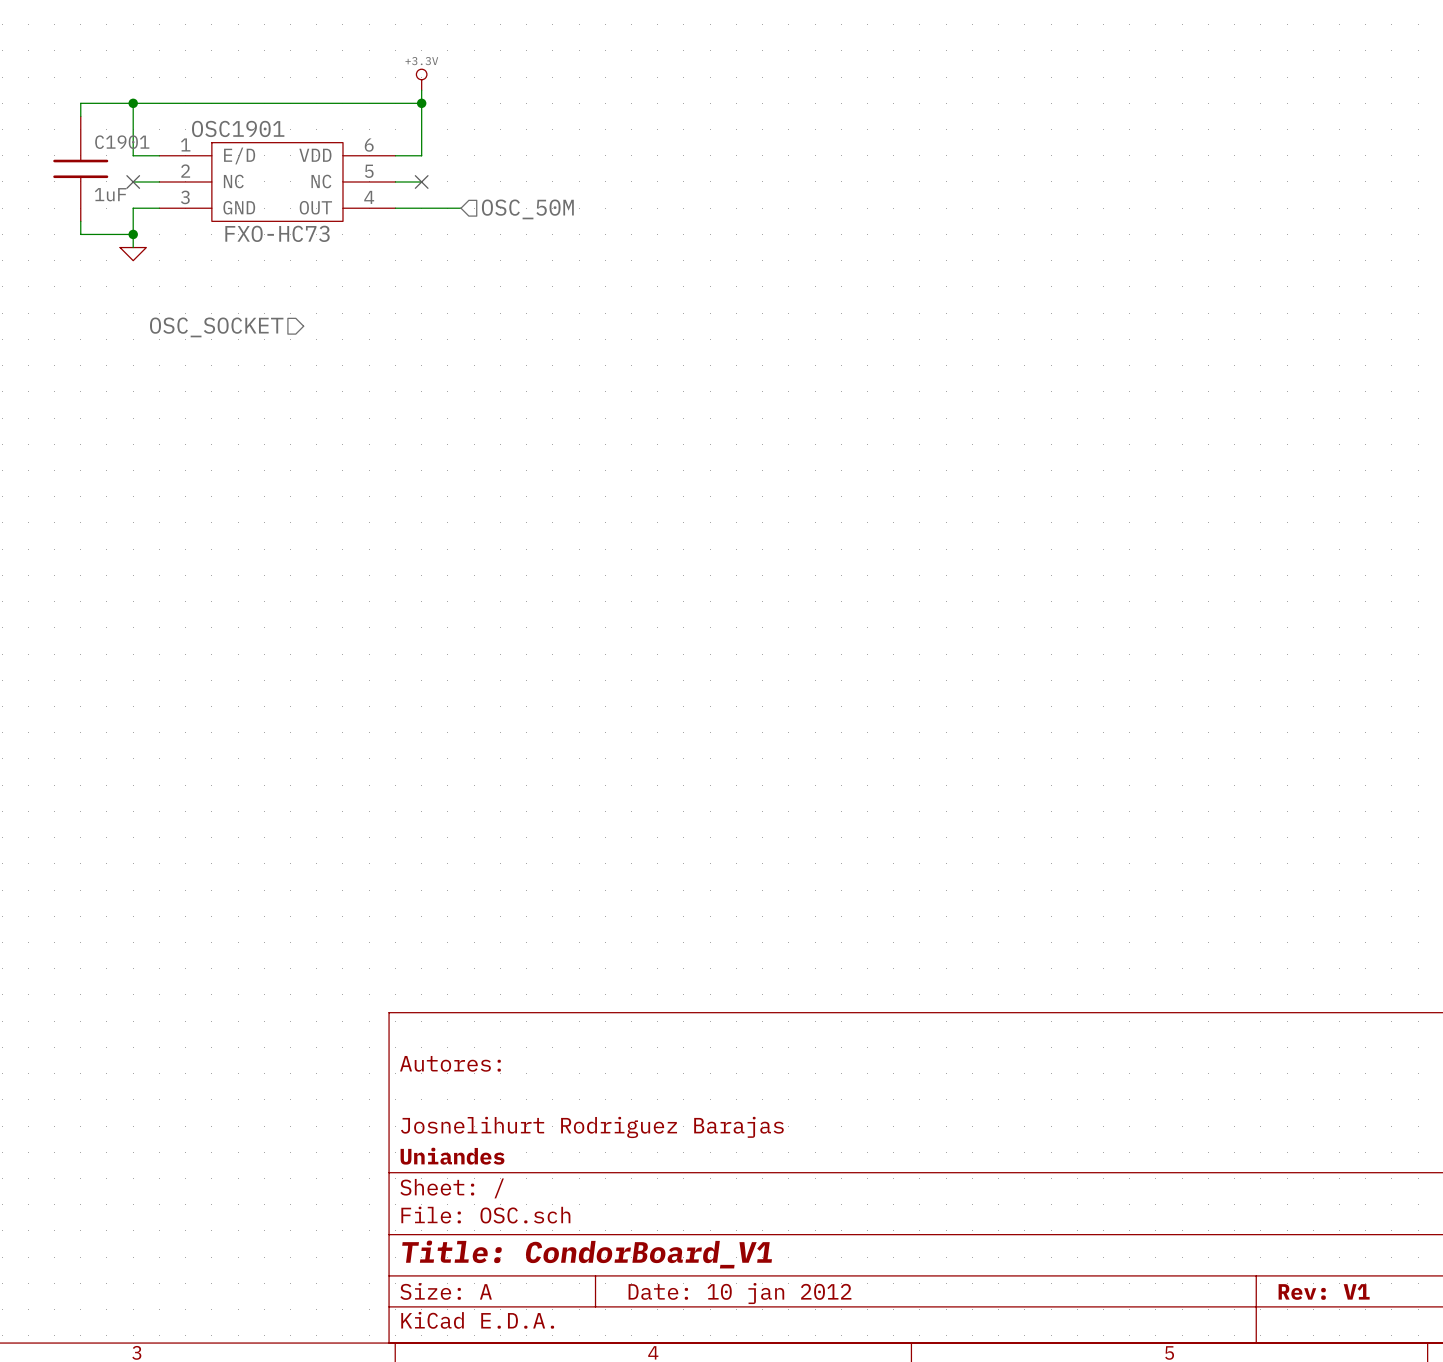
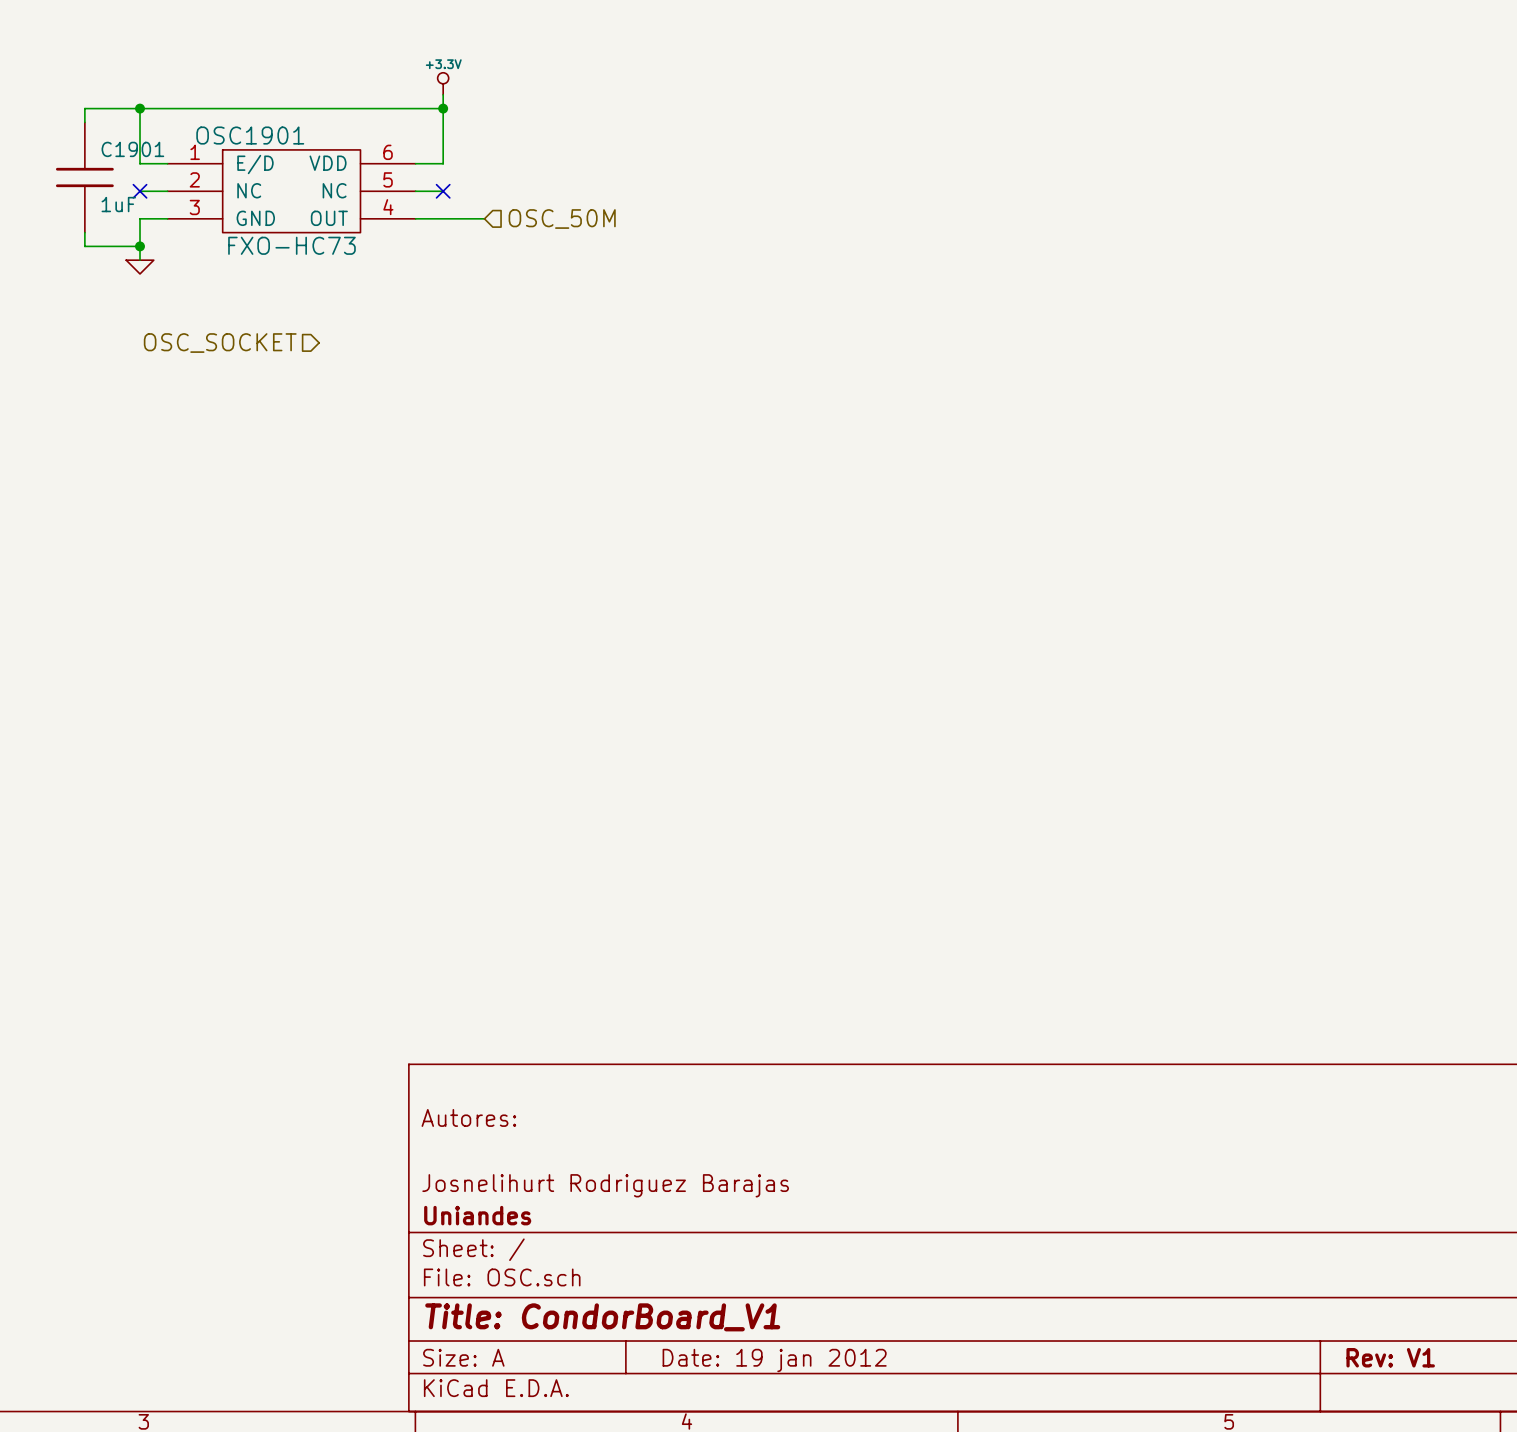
title block: Date: 10 jan 2012 (740, 1293) -> Date: 19 jan 2012 (774, 1360)

